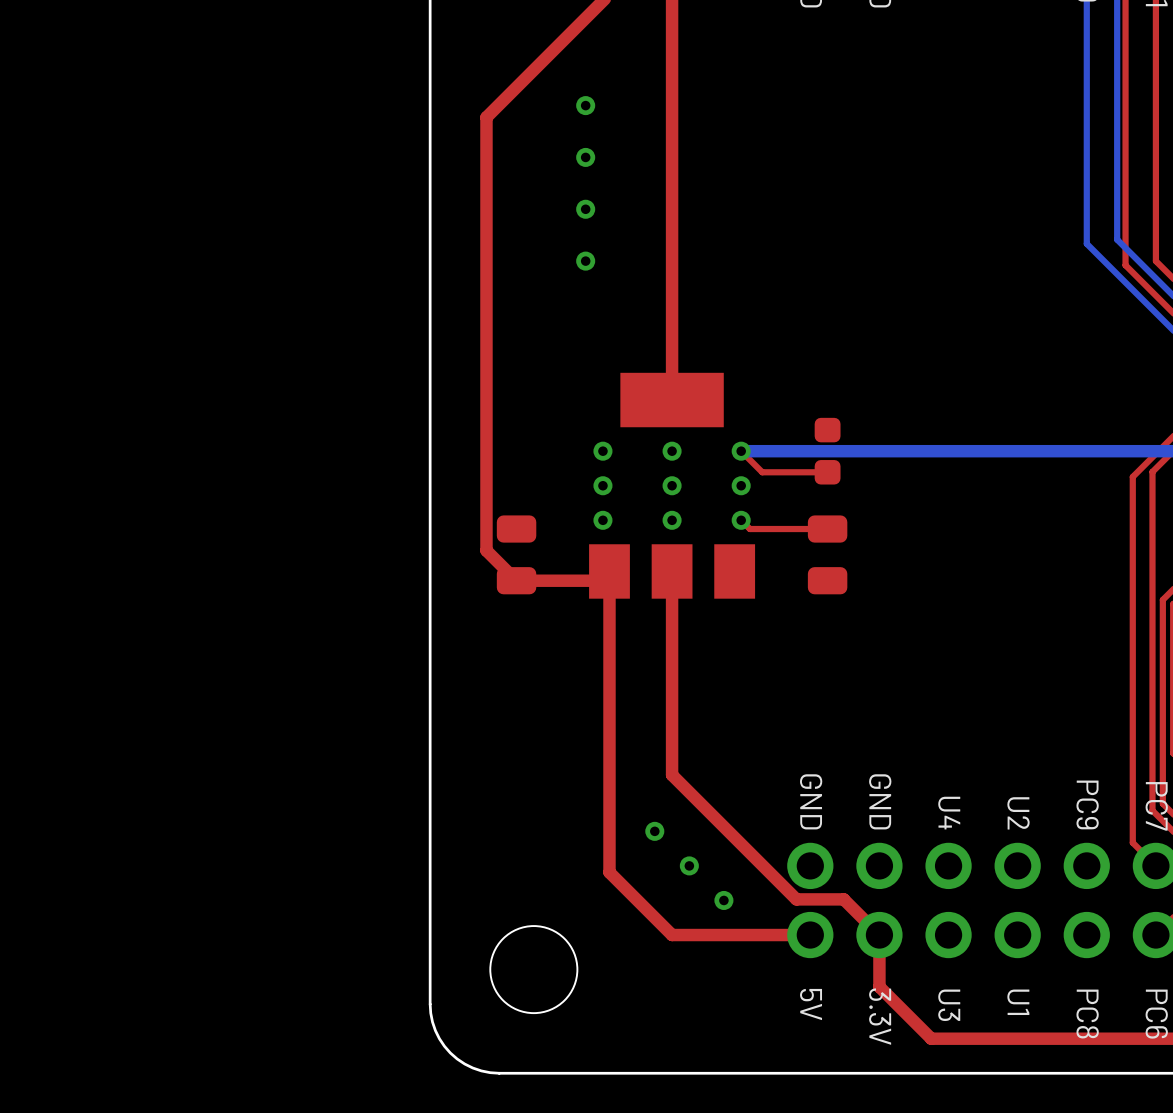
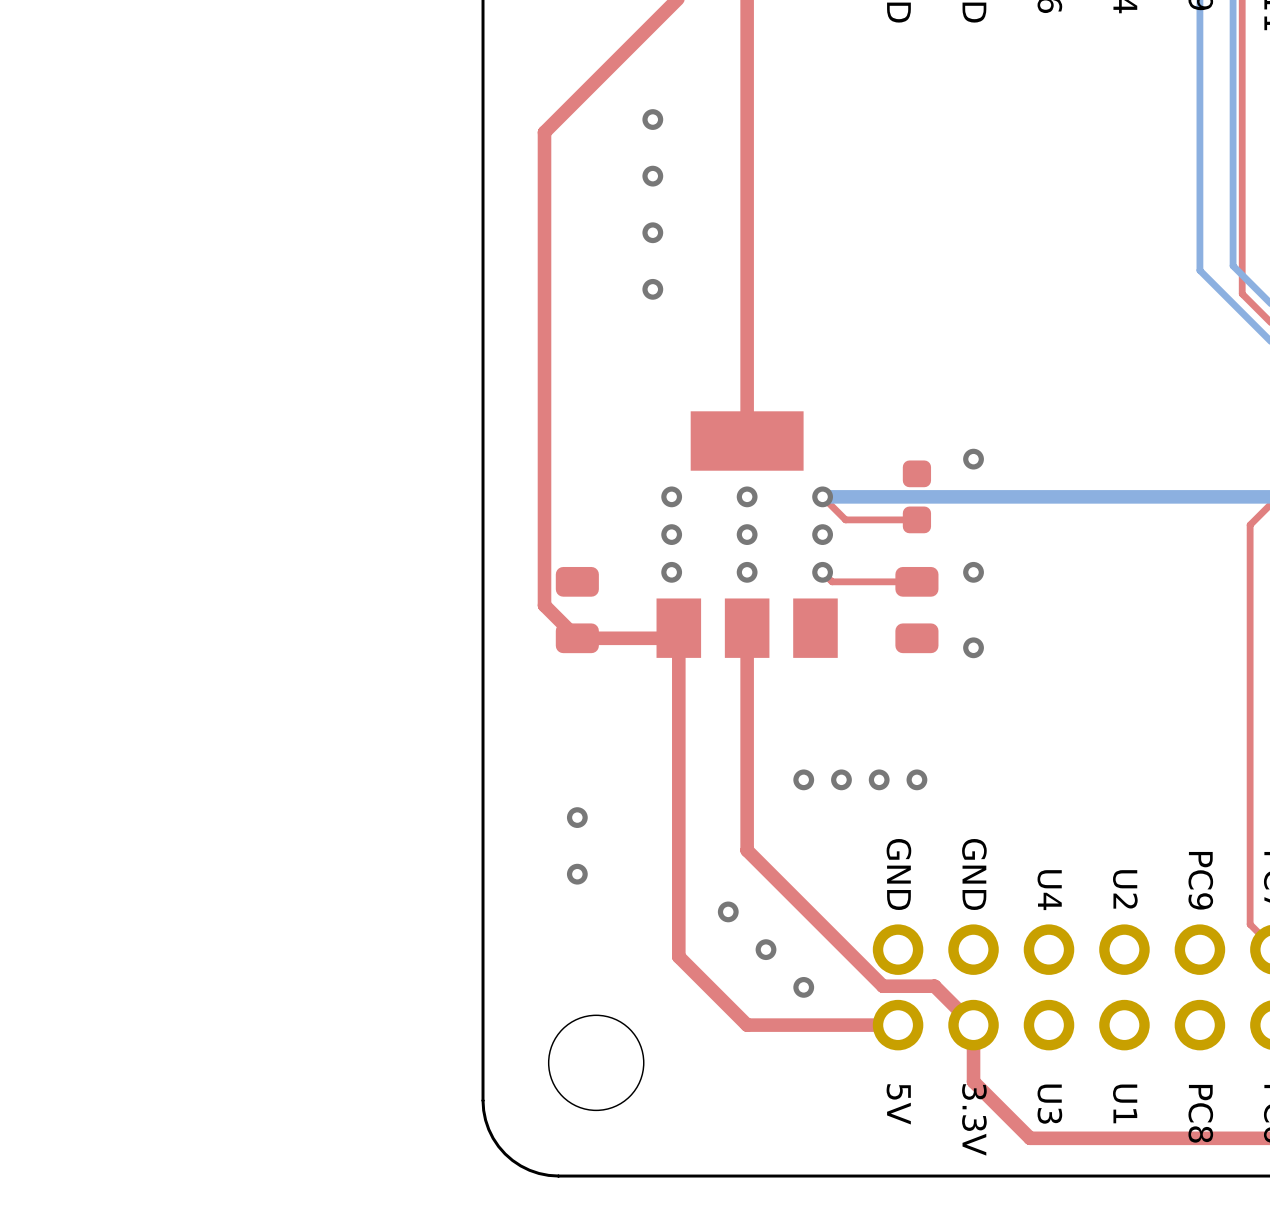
via: none -> (973, 459)
via: none -> (973, 572)
via: none -> (973, 647)
via: none -> (803, 779)
via: none -> (841, 779)
via: none -> (879, 779)
via: none -> (916, 779)
via: none -> (577, 817)
via: none -> (577, 874)

